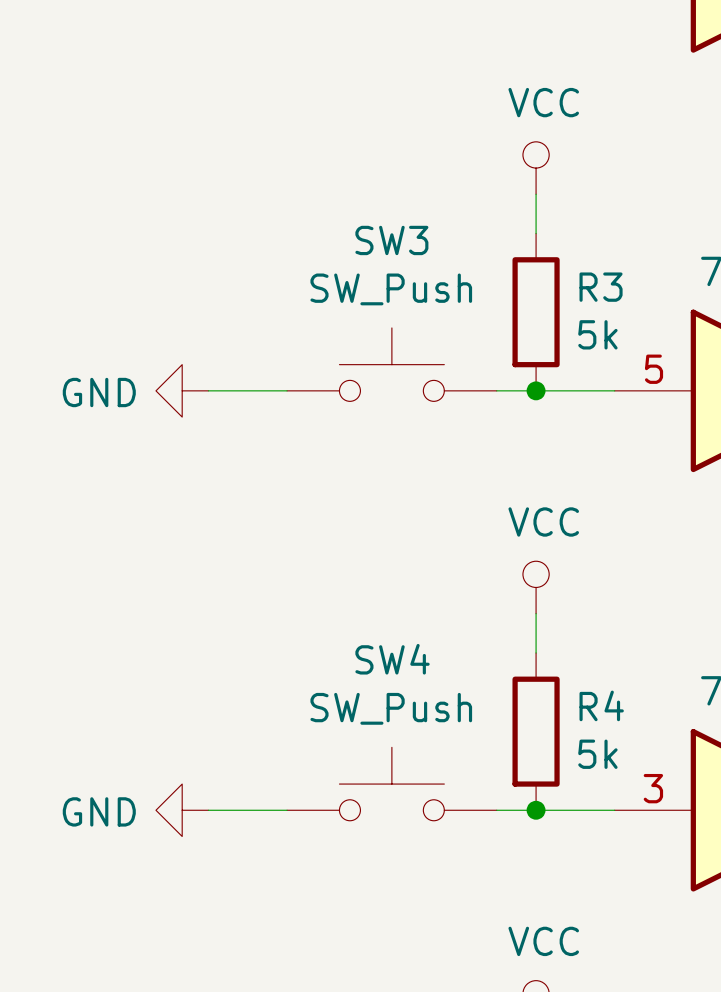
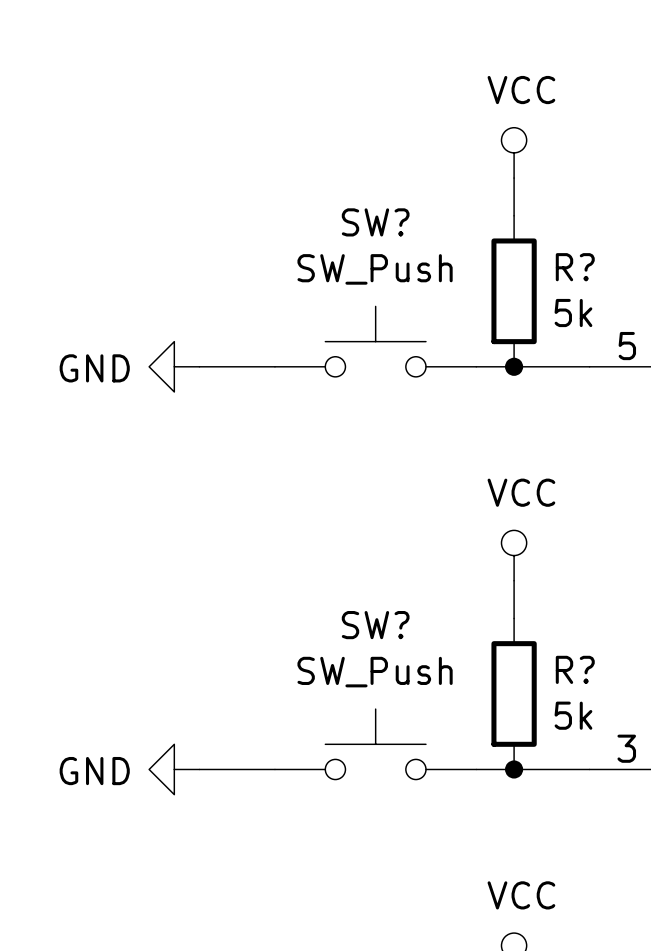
SW3 name: SW3 (391, 240) -> SW? (375, 222)
R3 name: R3 (601, 287) -> R? (575, 267)
SW4 name: SW4 (392, 659) -> SW? (375, 625)
R4 name: R4 (601, 705) -> R? (575, 669)

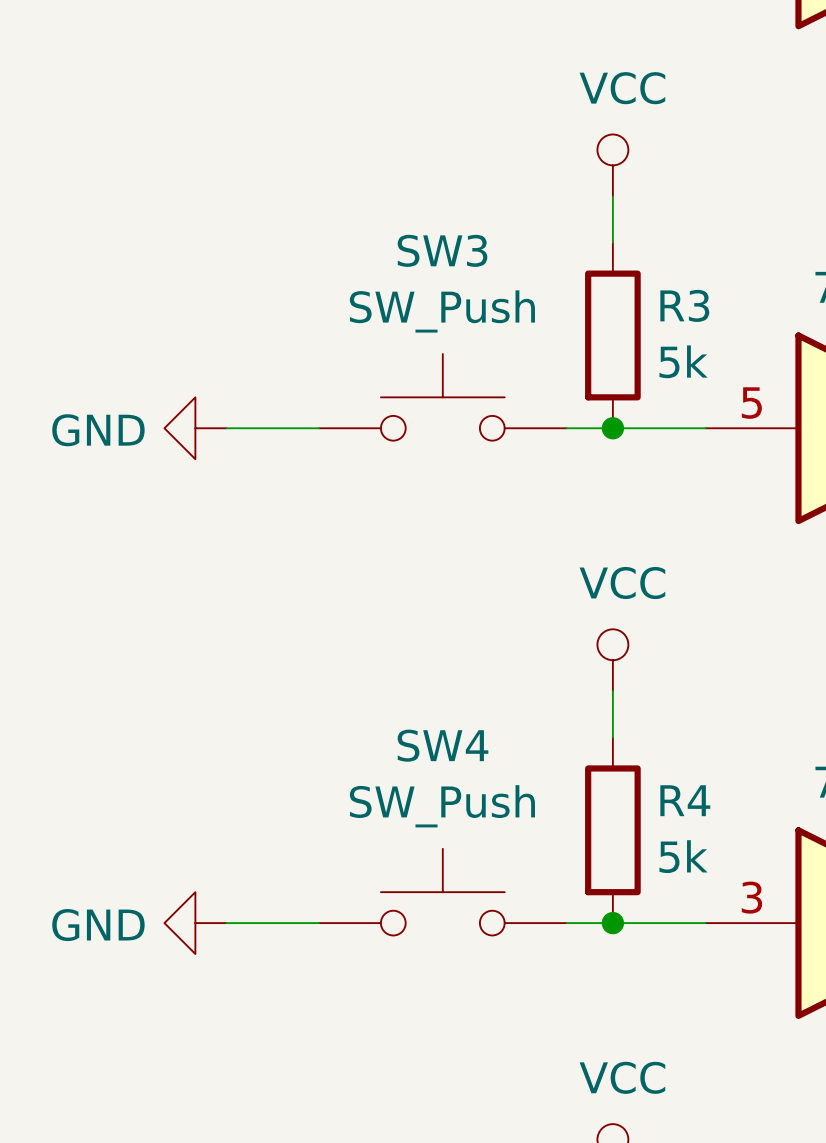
SW? name: SW? (375, 222) -> SW3 (442, 250)
R? name: R? (575, 267) -> R3 (684, 305)
SW? name: SW? (375, 625) -> SW4 (443, 745)
R? name: R? (575, 669) -> R4 (685, 800)

